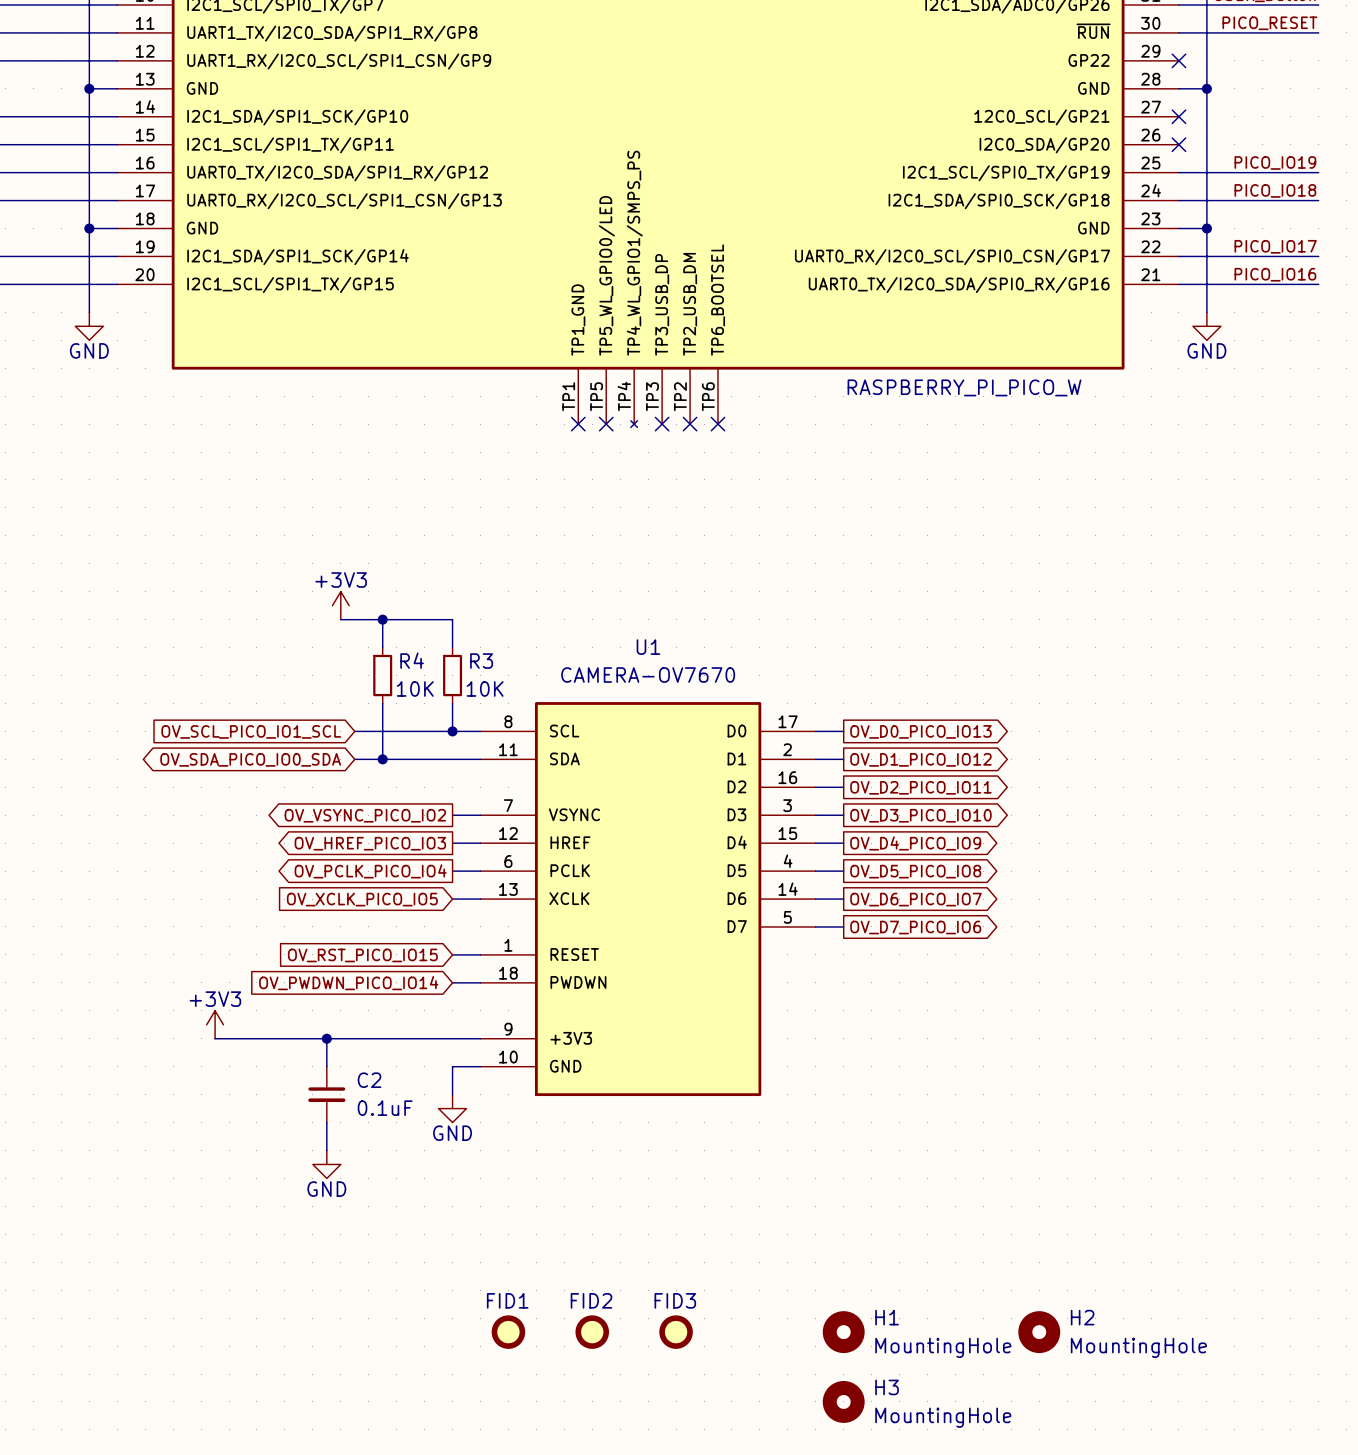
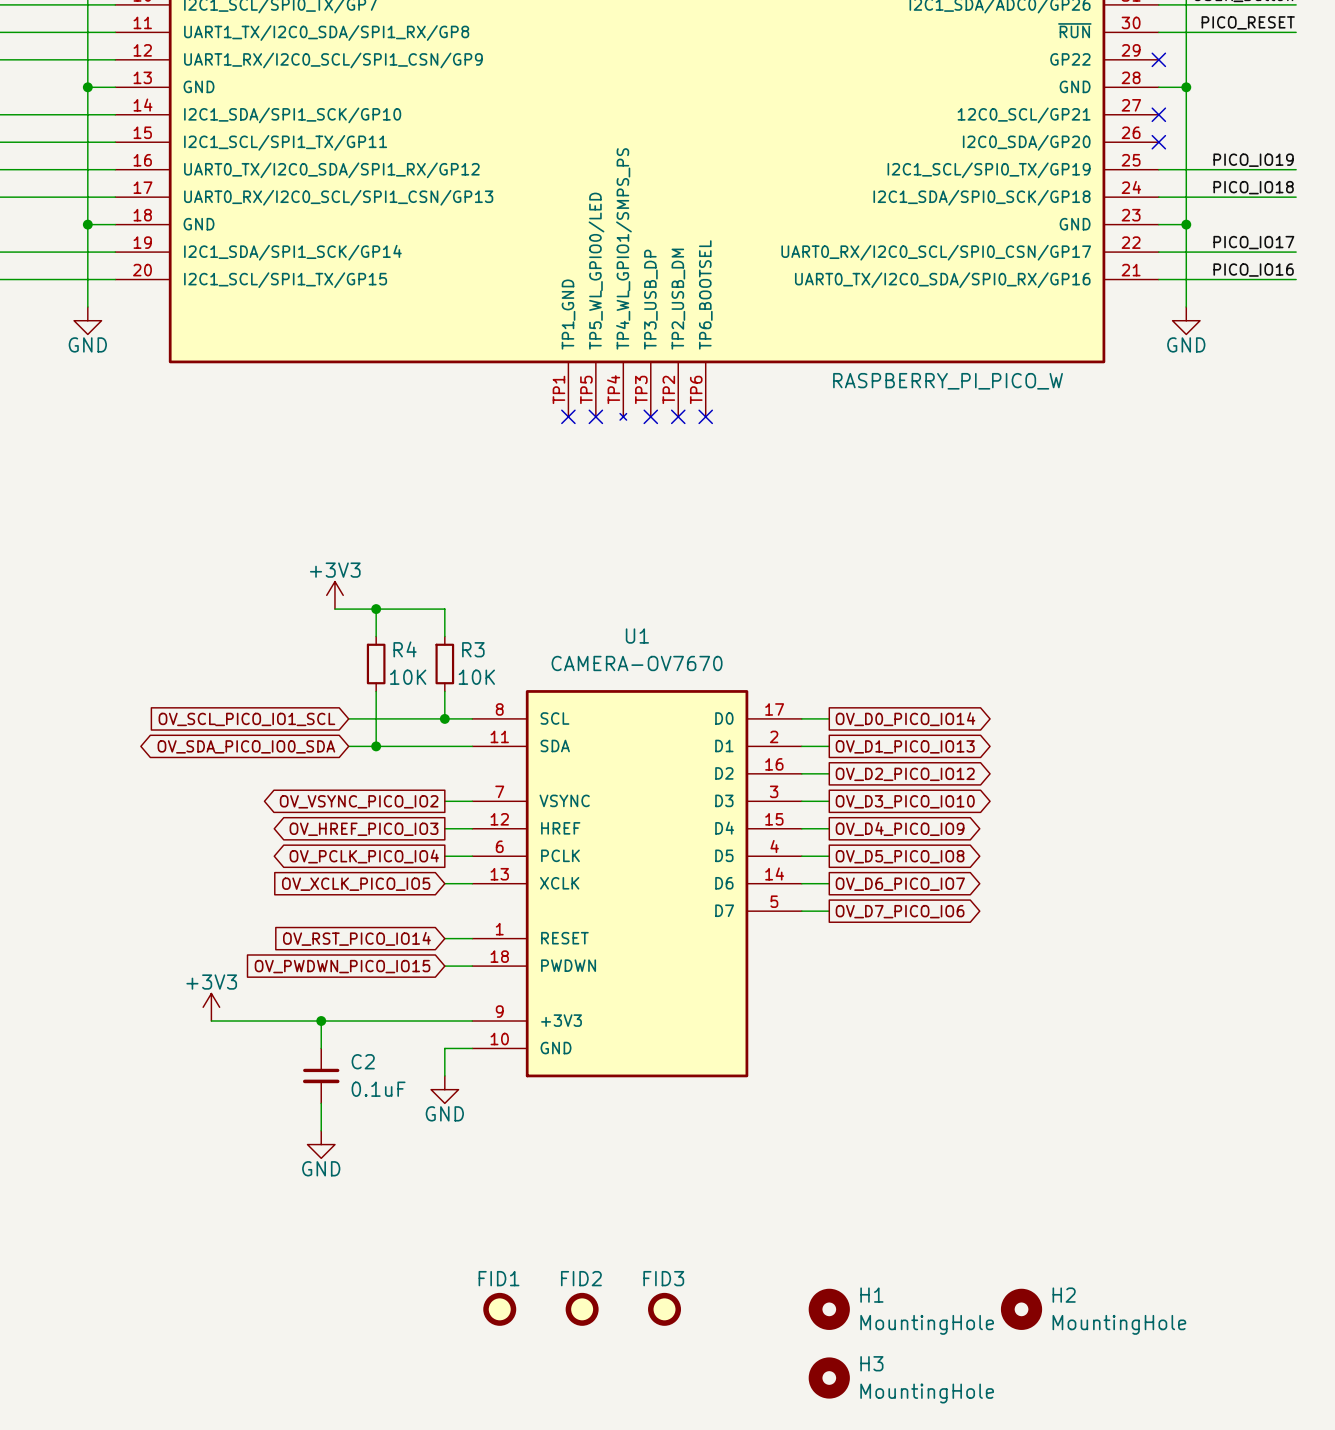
global label: OV_D0_PICO_IO13 (920, 731) -> OV_D0_PICO_IO14 (905, 719)
global label: OV_D1_PICO_IO12 (920, 759) -> OV_D1_PICO_IO13 (905, 746)
global label: OV_D2_PICO_IO11 (920, 787) -> OV_D2_PICO_IO12 (905, 774)
global label: OV_RST_PICO_IO15 (362, 955) -> OV_RST_PICO_IO14 (356, 938)
global label: OV_PWDWN_PICO_IO14 (348, 983) -> OV_PWDWN_PICO_IO15 (342, 966)

